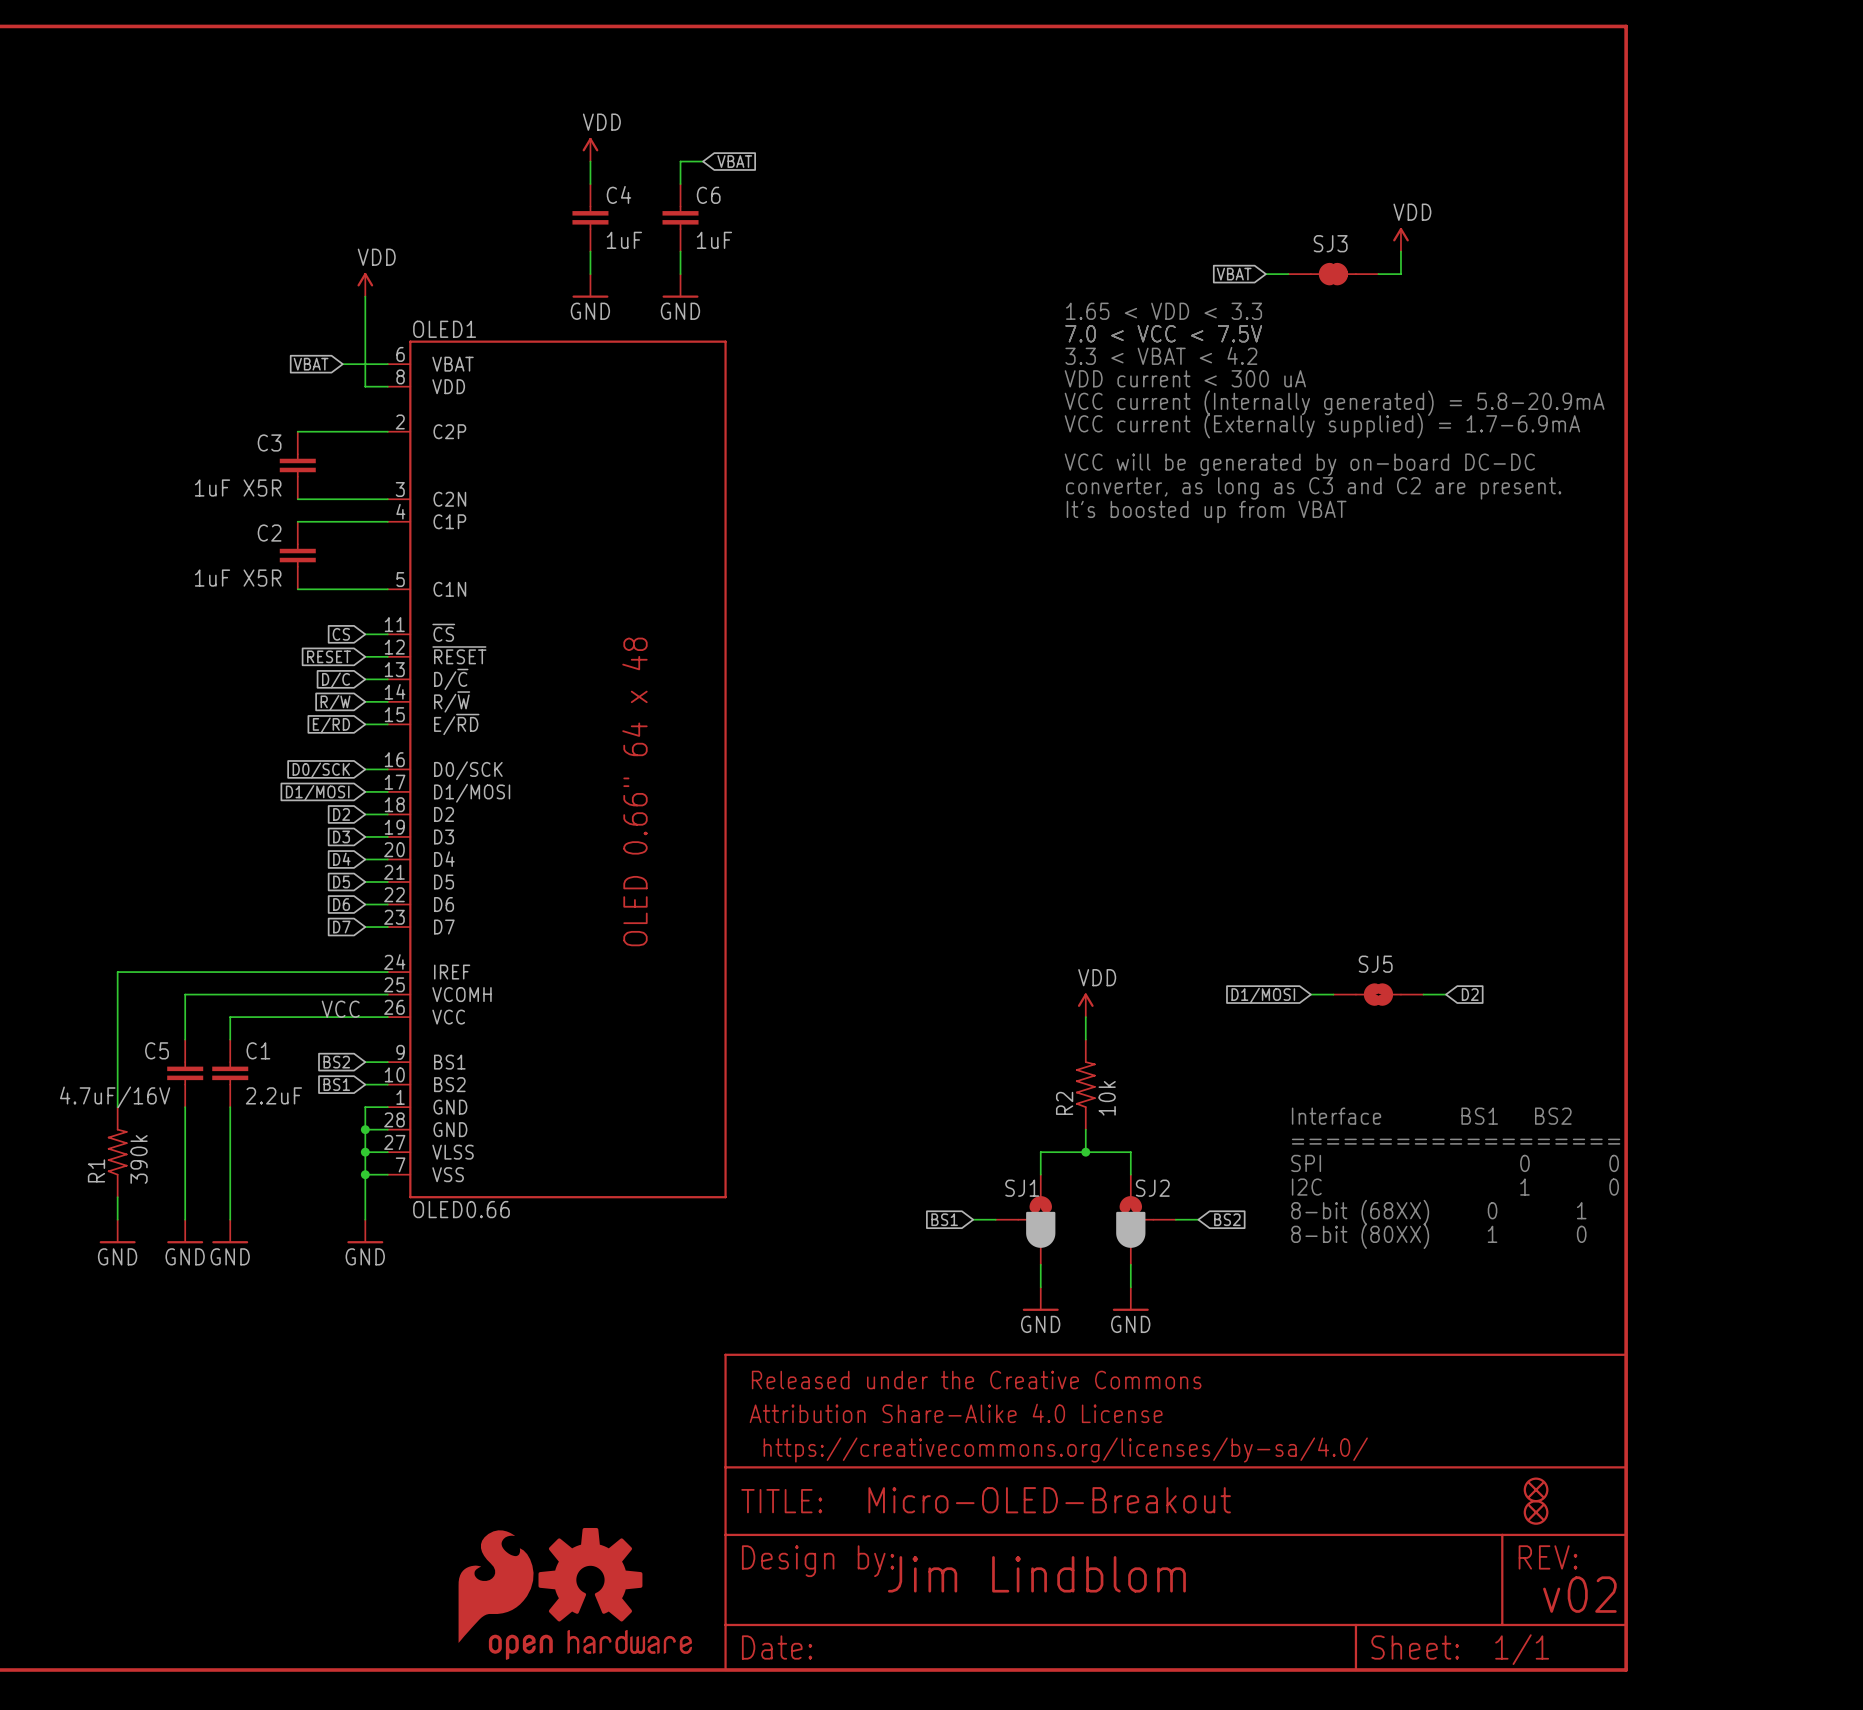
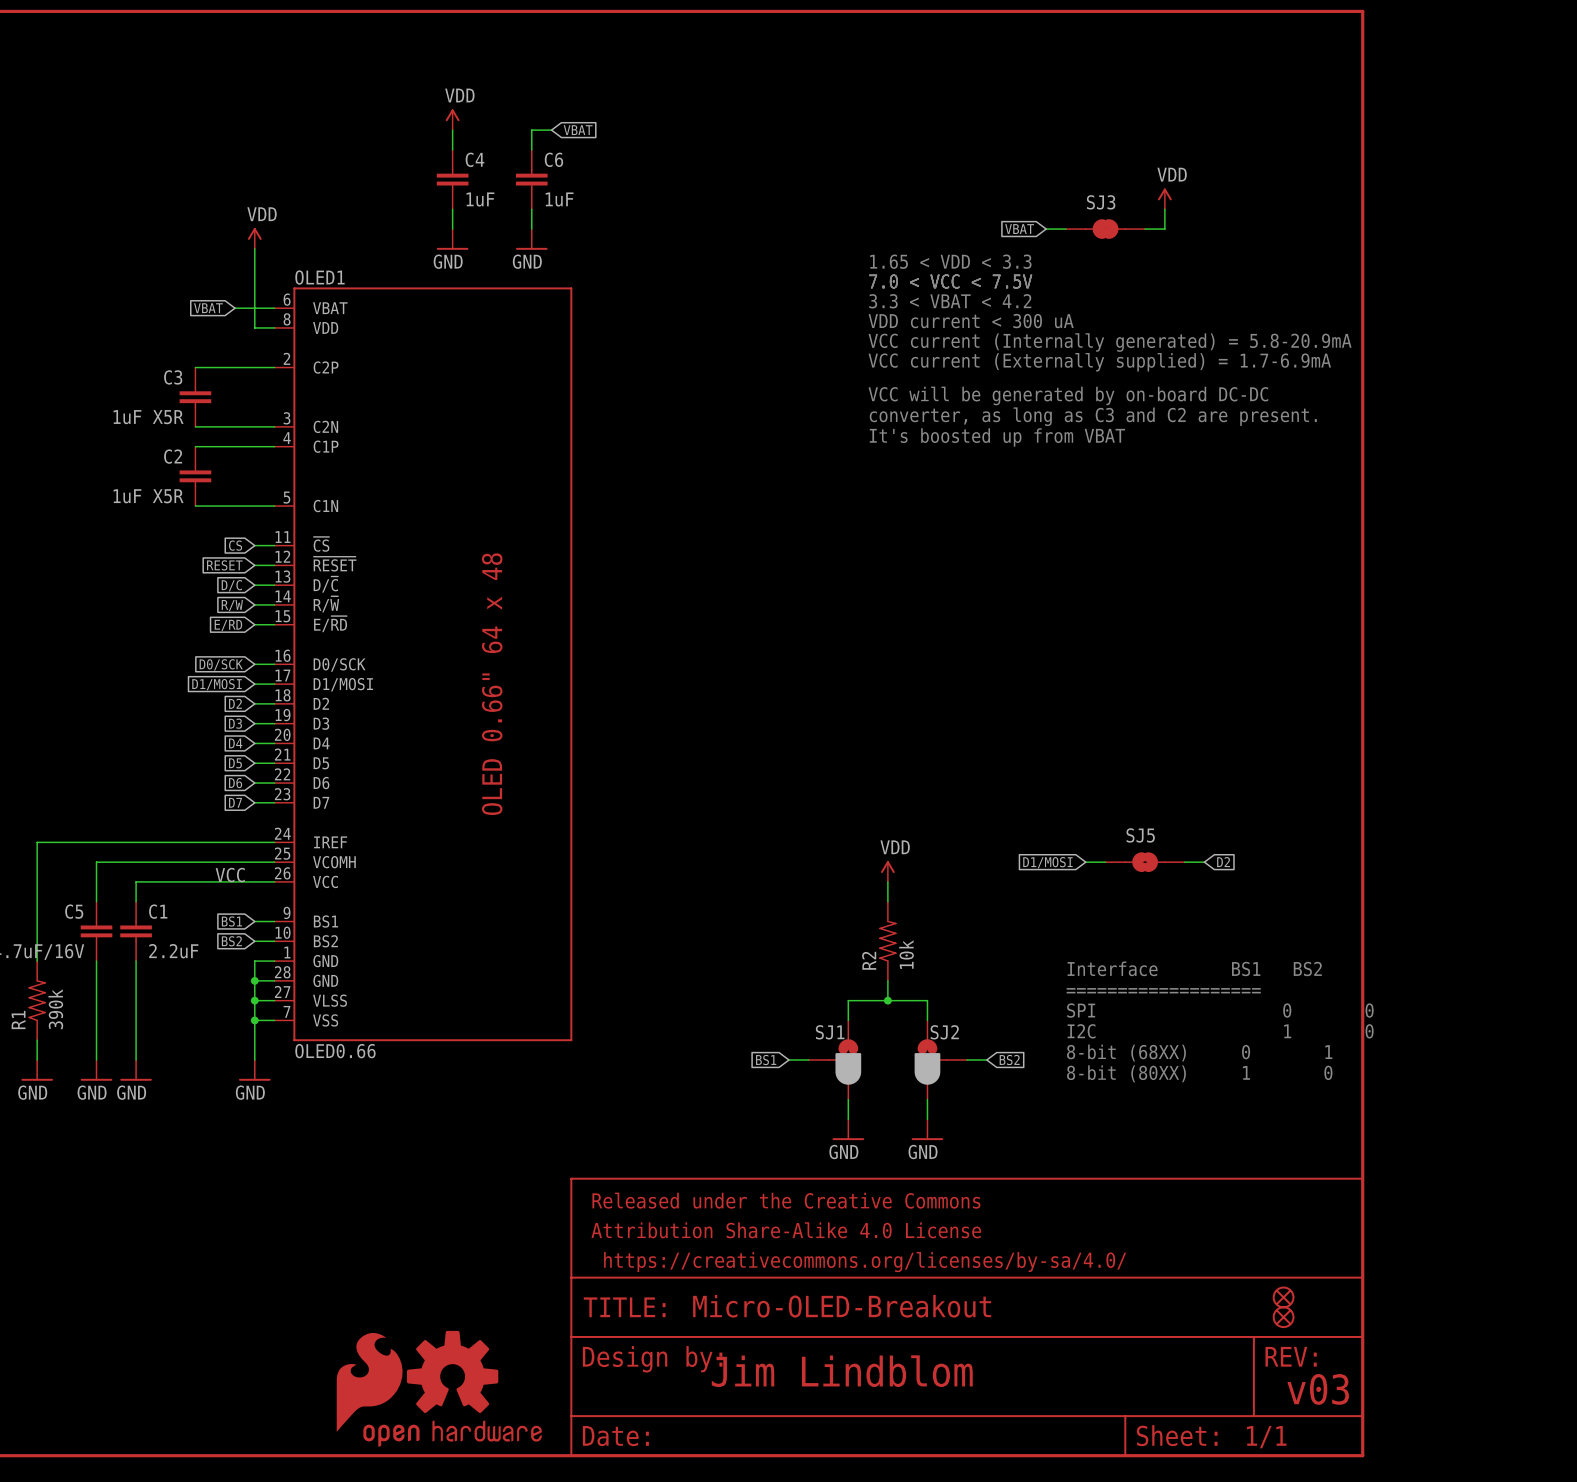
global label: BS2 (336, 1062) -> BS1 (231, 921)
global label: BS1 (336, 1084) -> BS2 (231, 941)
text: v02 (1579, 1594) -> v03 (1318, 1389)

